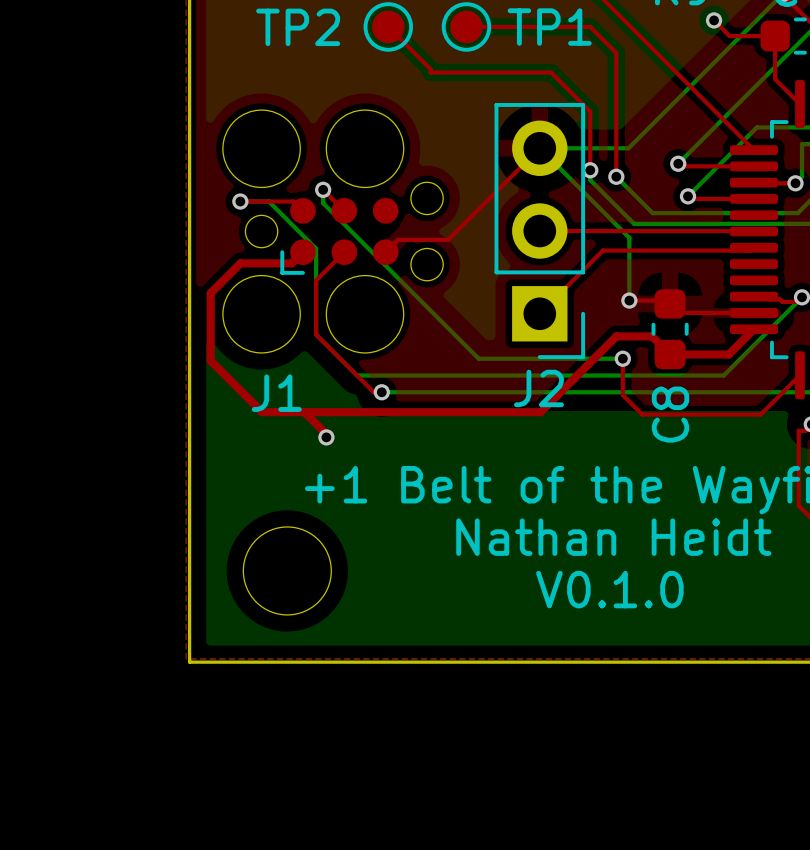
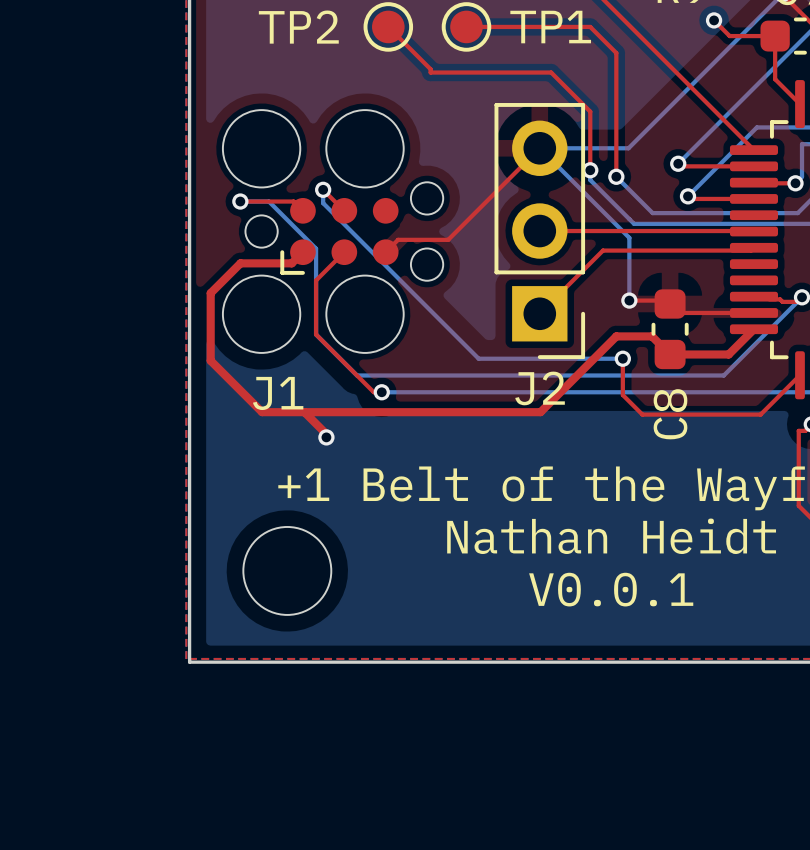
text: V0.1.0 (609, 589) -> V0.0.1 (611, 589)

